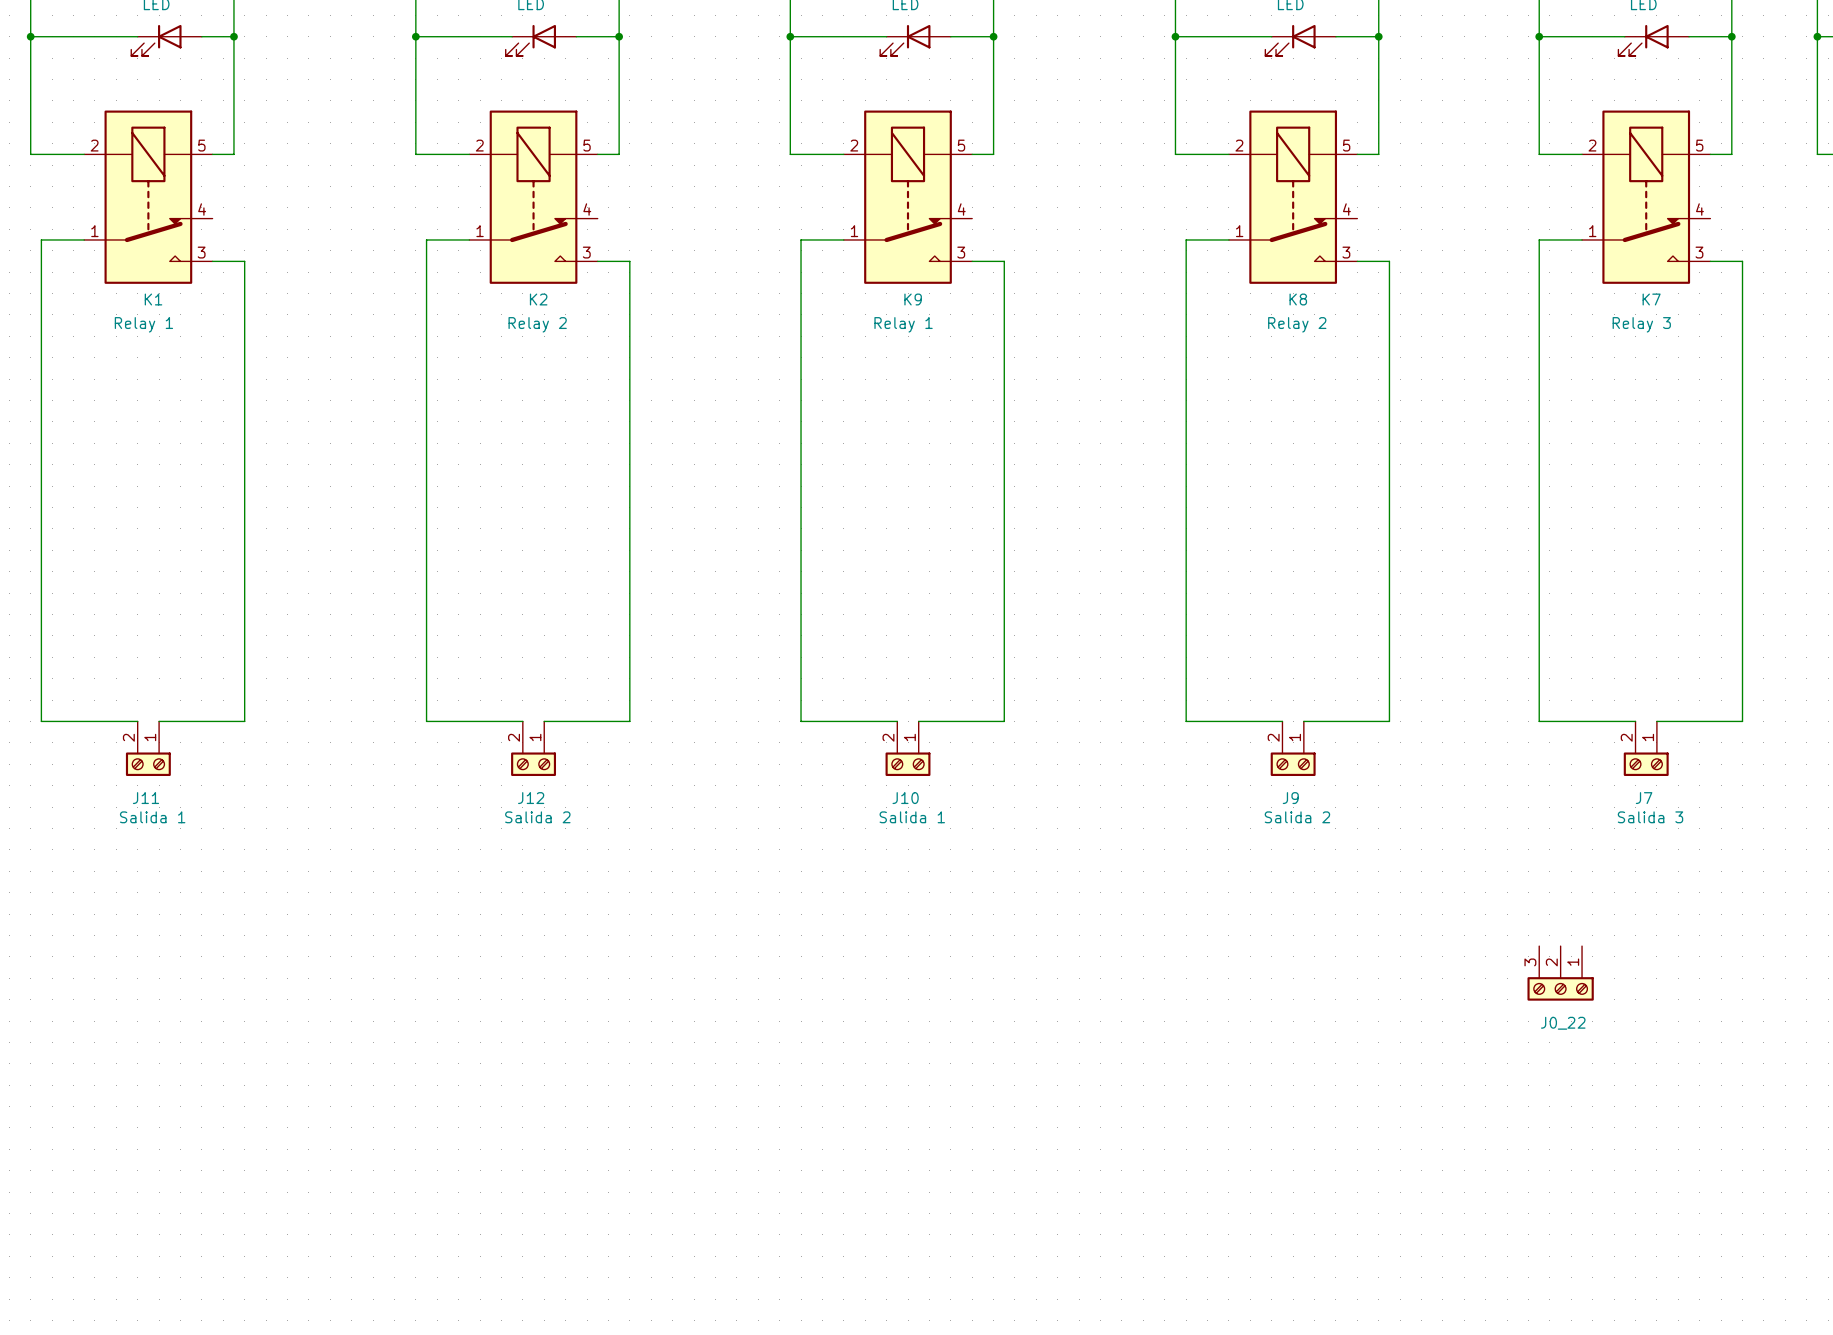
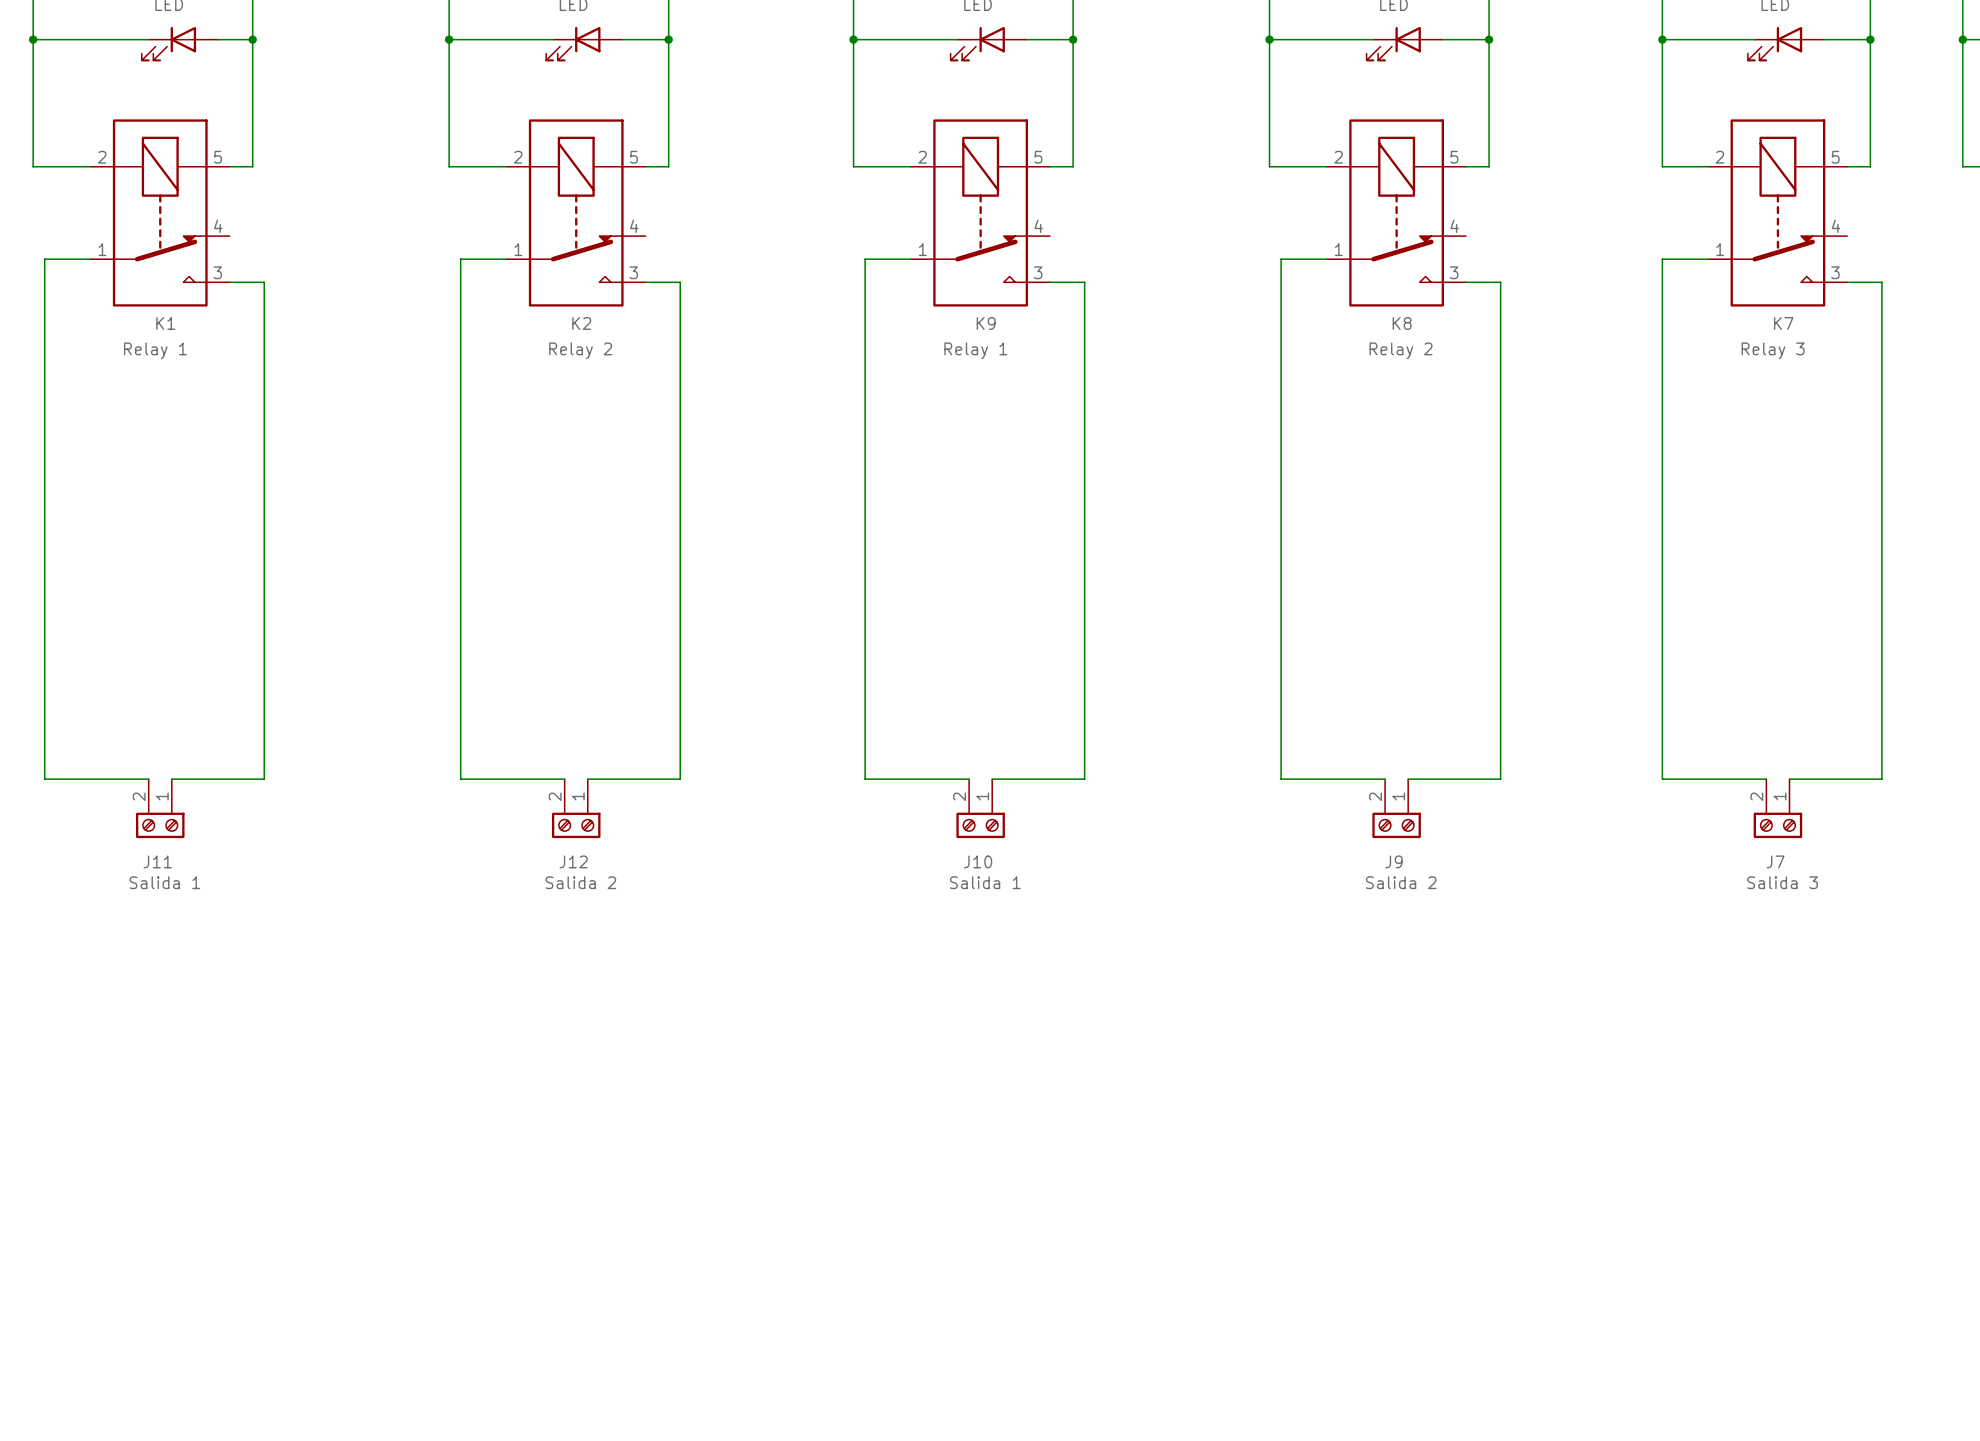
J0_22: (1560, 973) -> none

